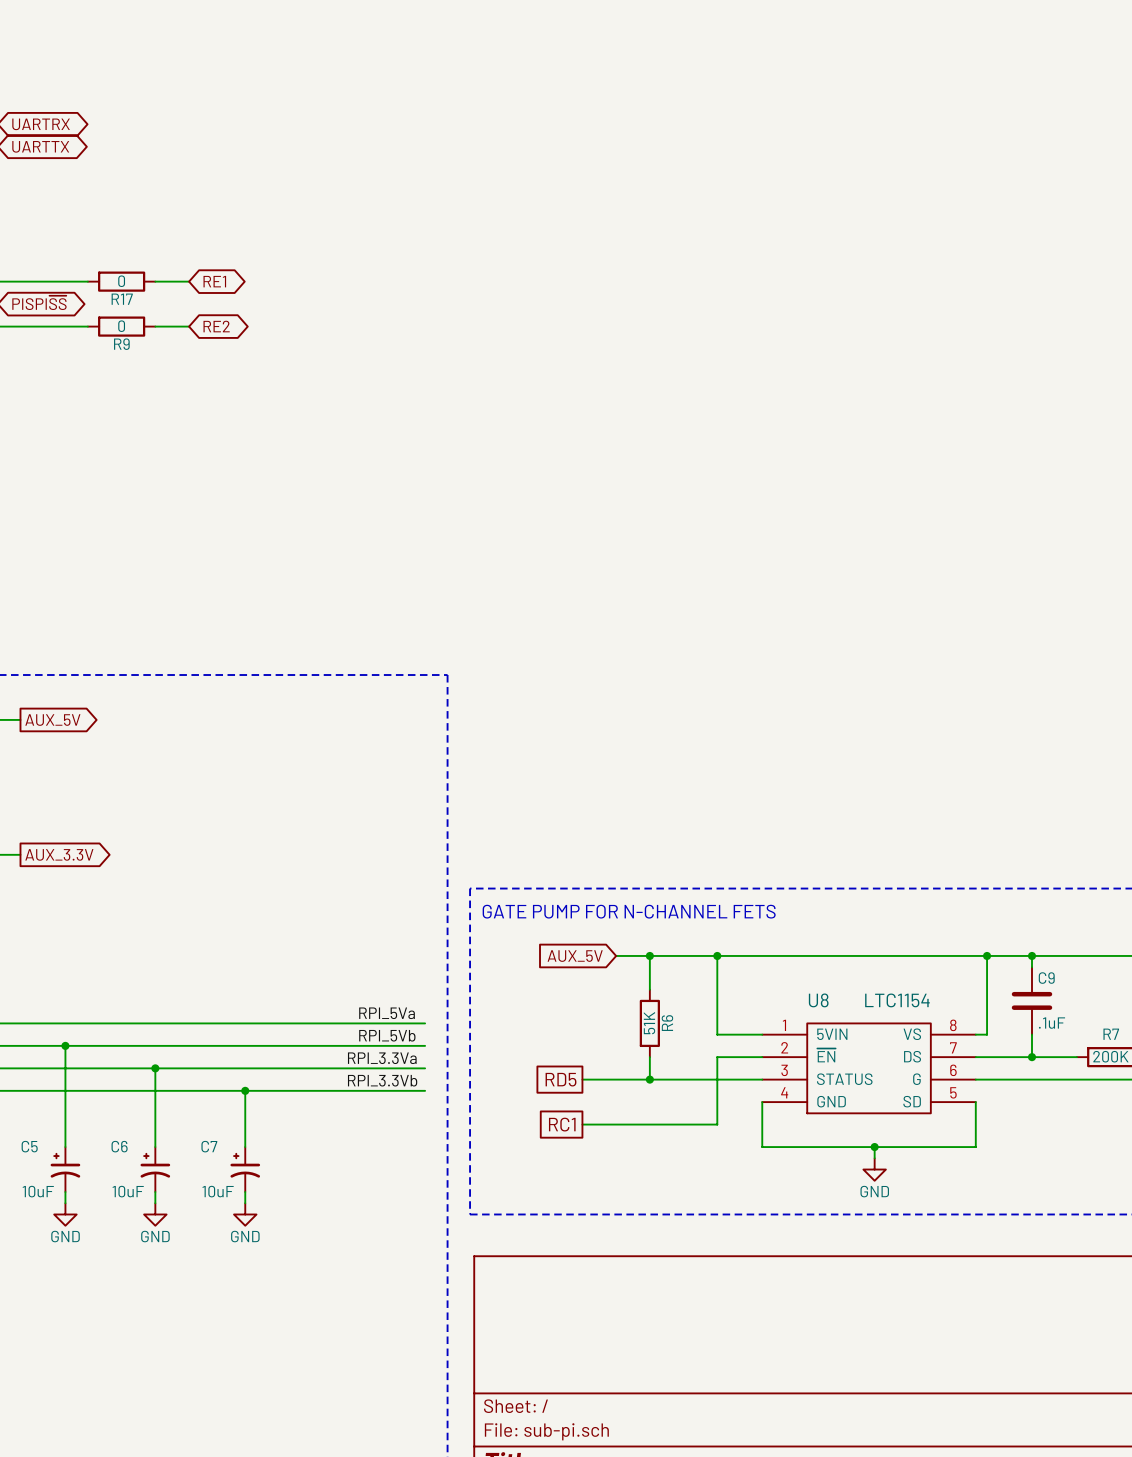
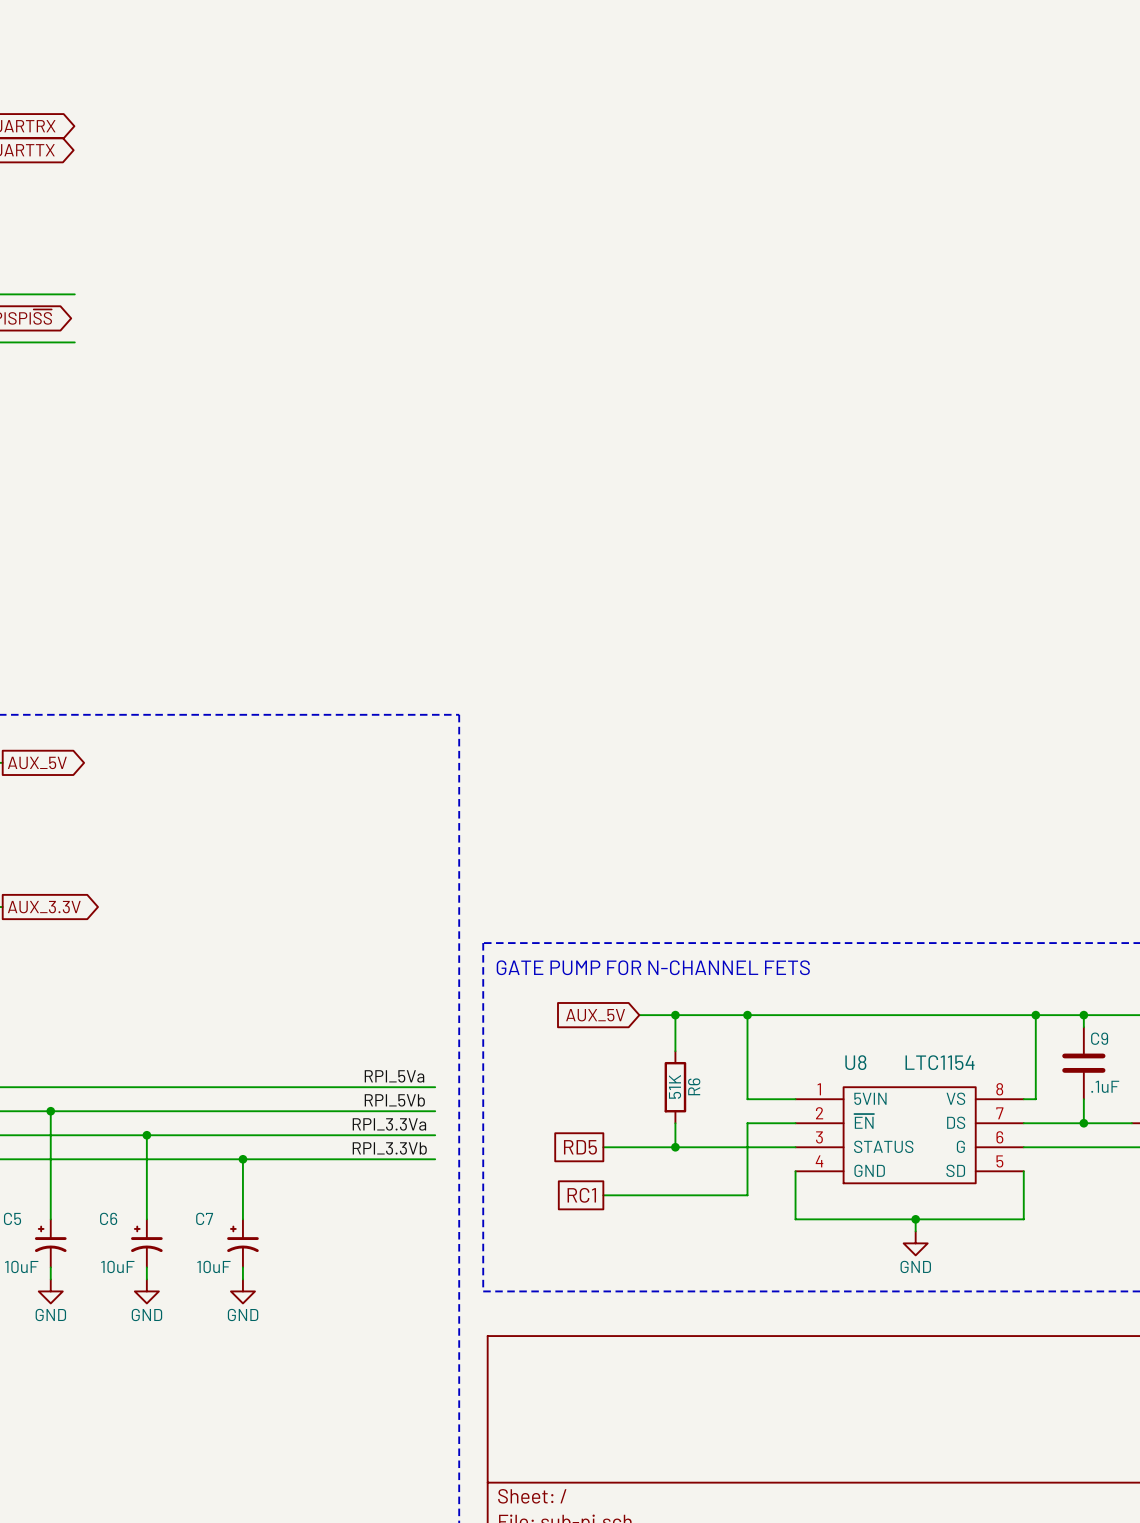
R17: 0 (121, 281) -> none
wire: (155, 281) (189, 281) -> none
global label: RE1 (214, 281) -> none
R9: 0 (121, 326) -> none
wire: (155, 326) (189, 326) -> none
global label: RE2 (216, 326) -> none

